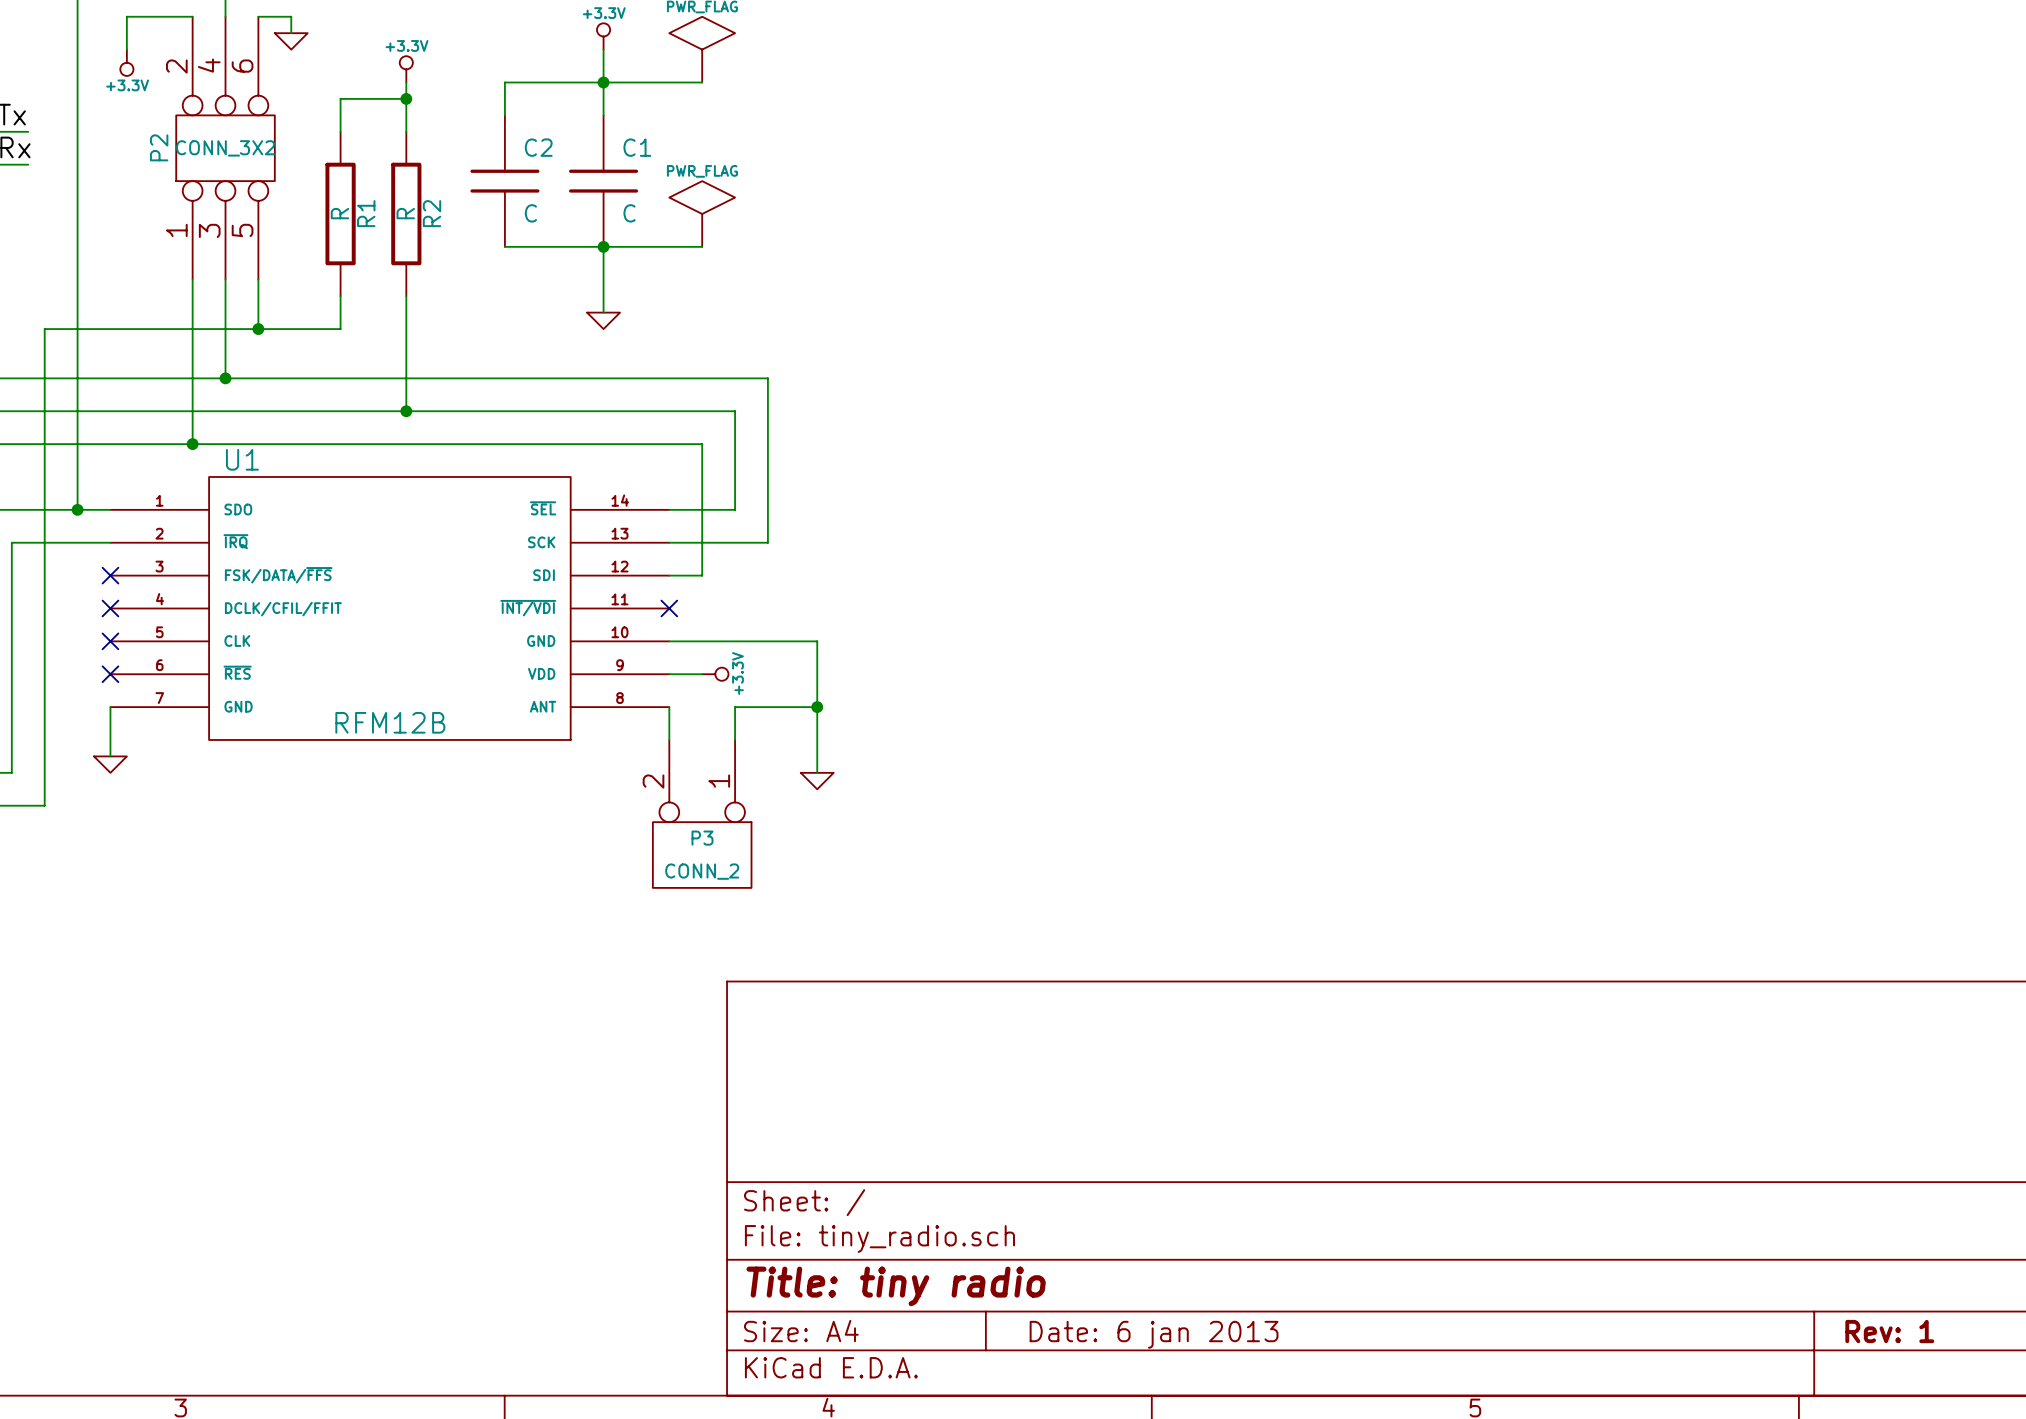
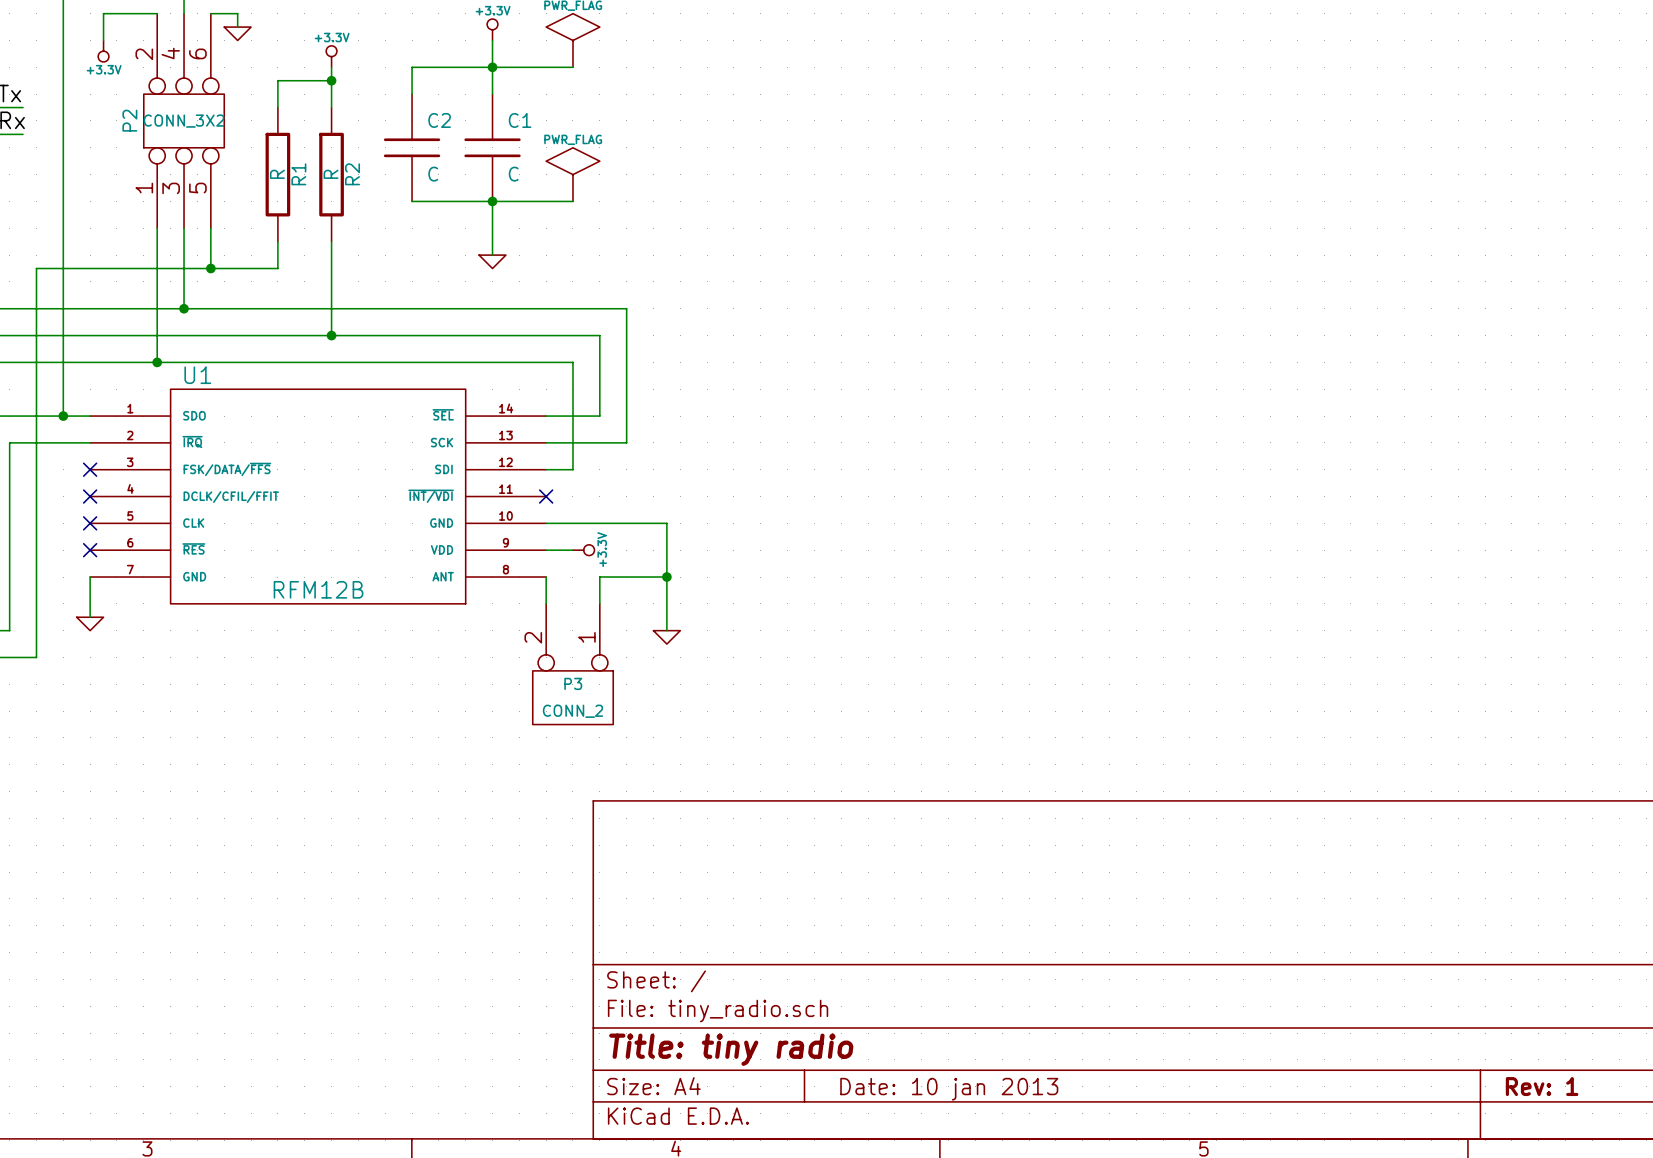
title block: Date: 6 jan 2013 (1154, 1334) -> Date: 10 jan 2013 (949, 1089)

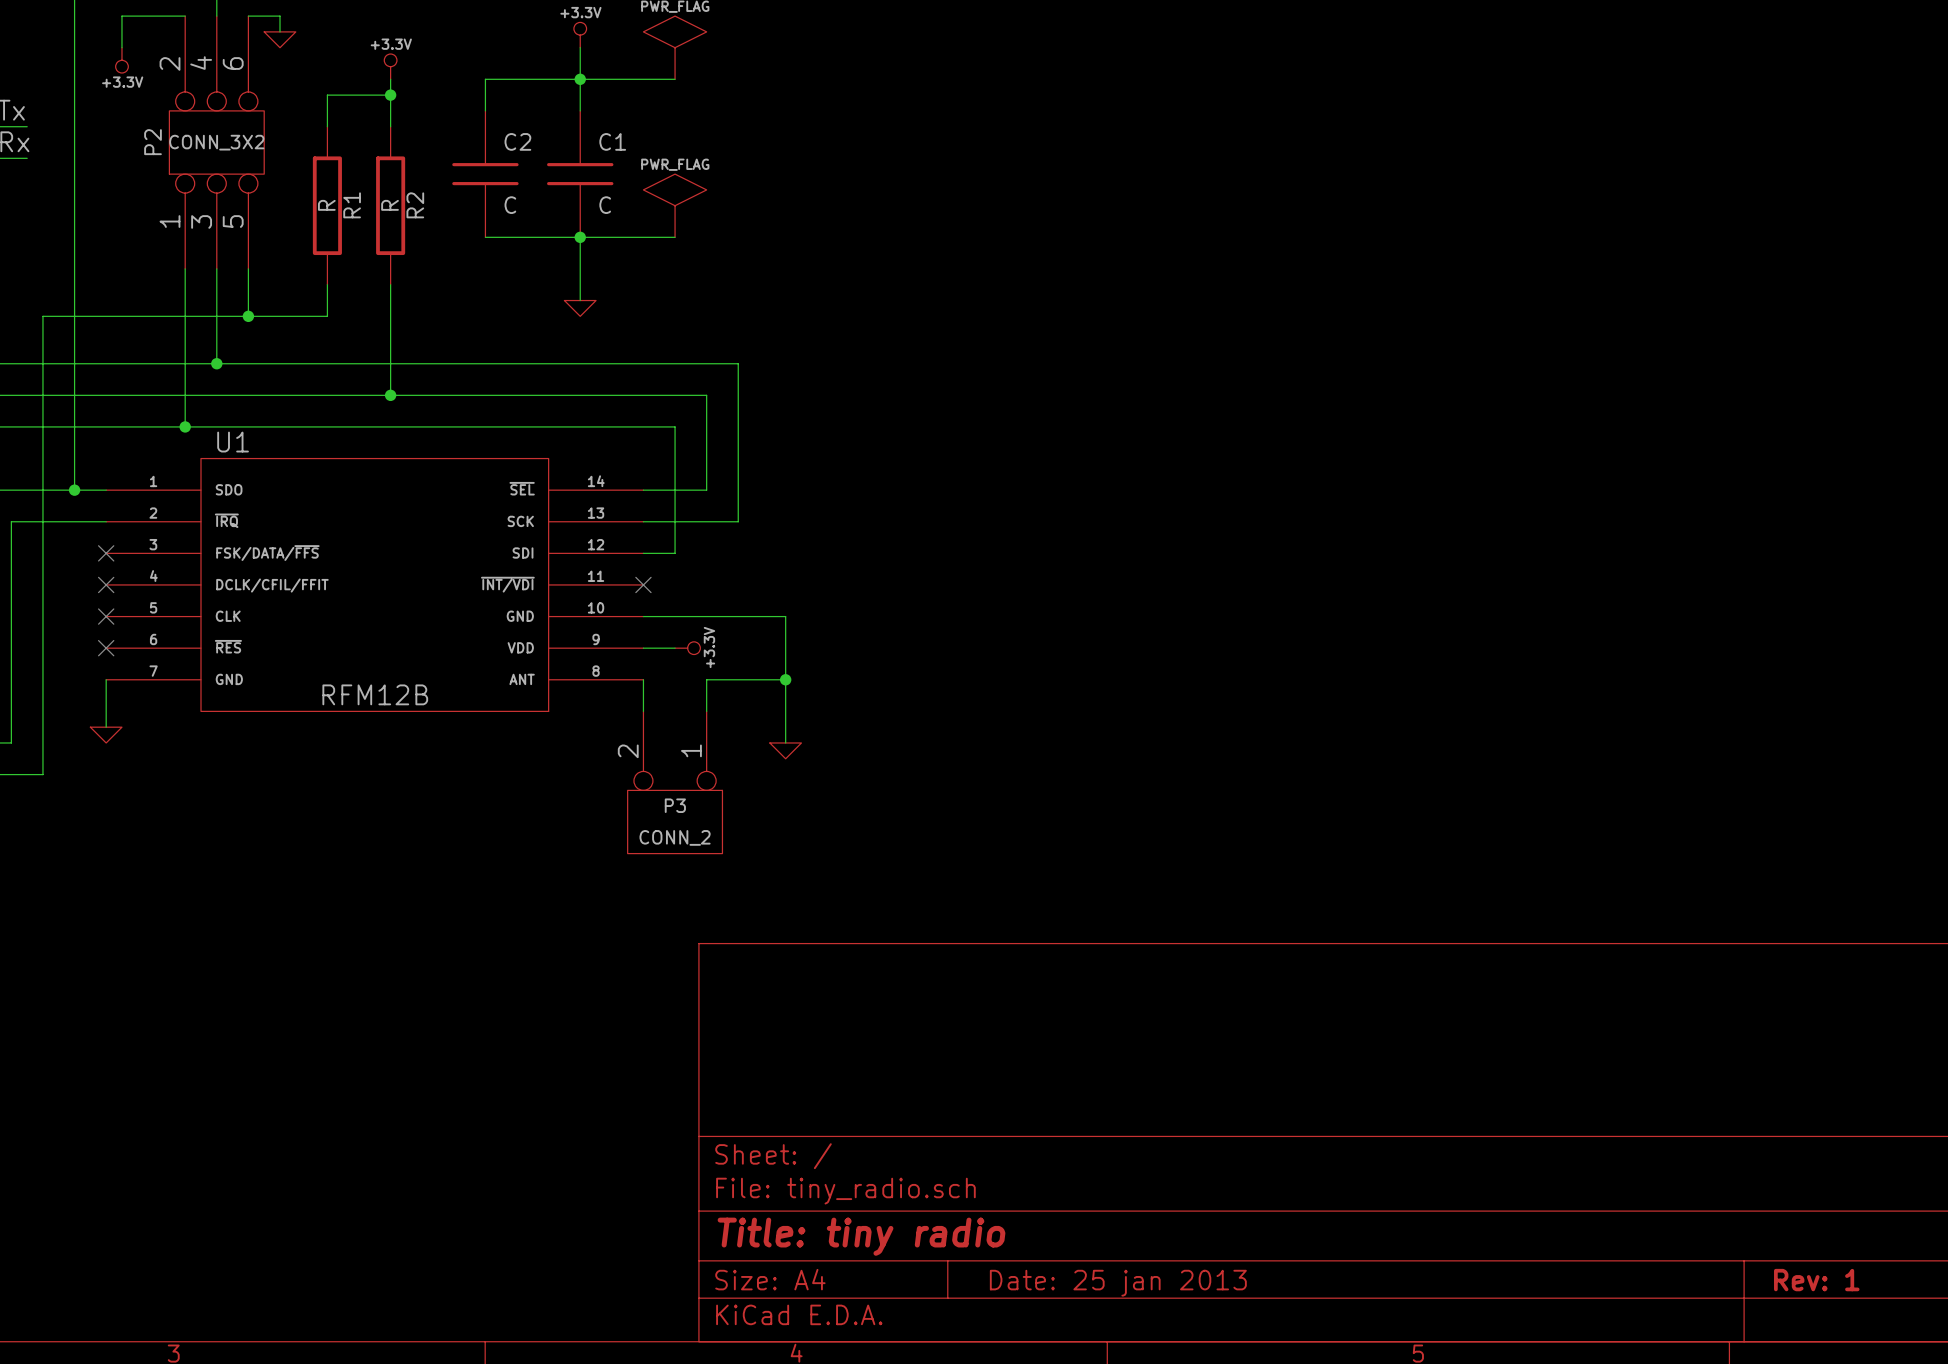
title block: Date: 10 jan 2013 (949, 1089) -> Date: 25 jan 2013 (1118, 1283)

